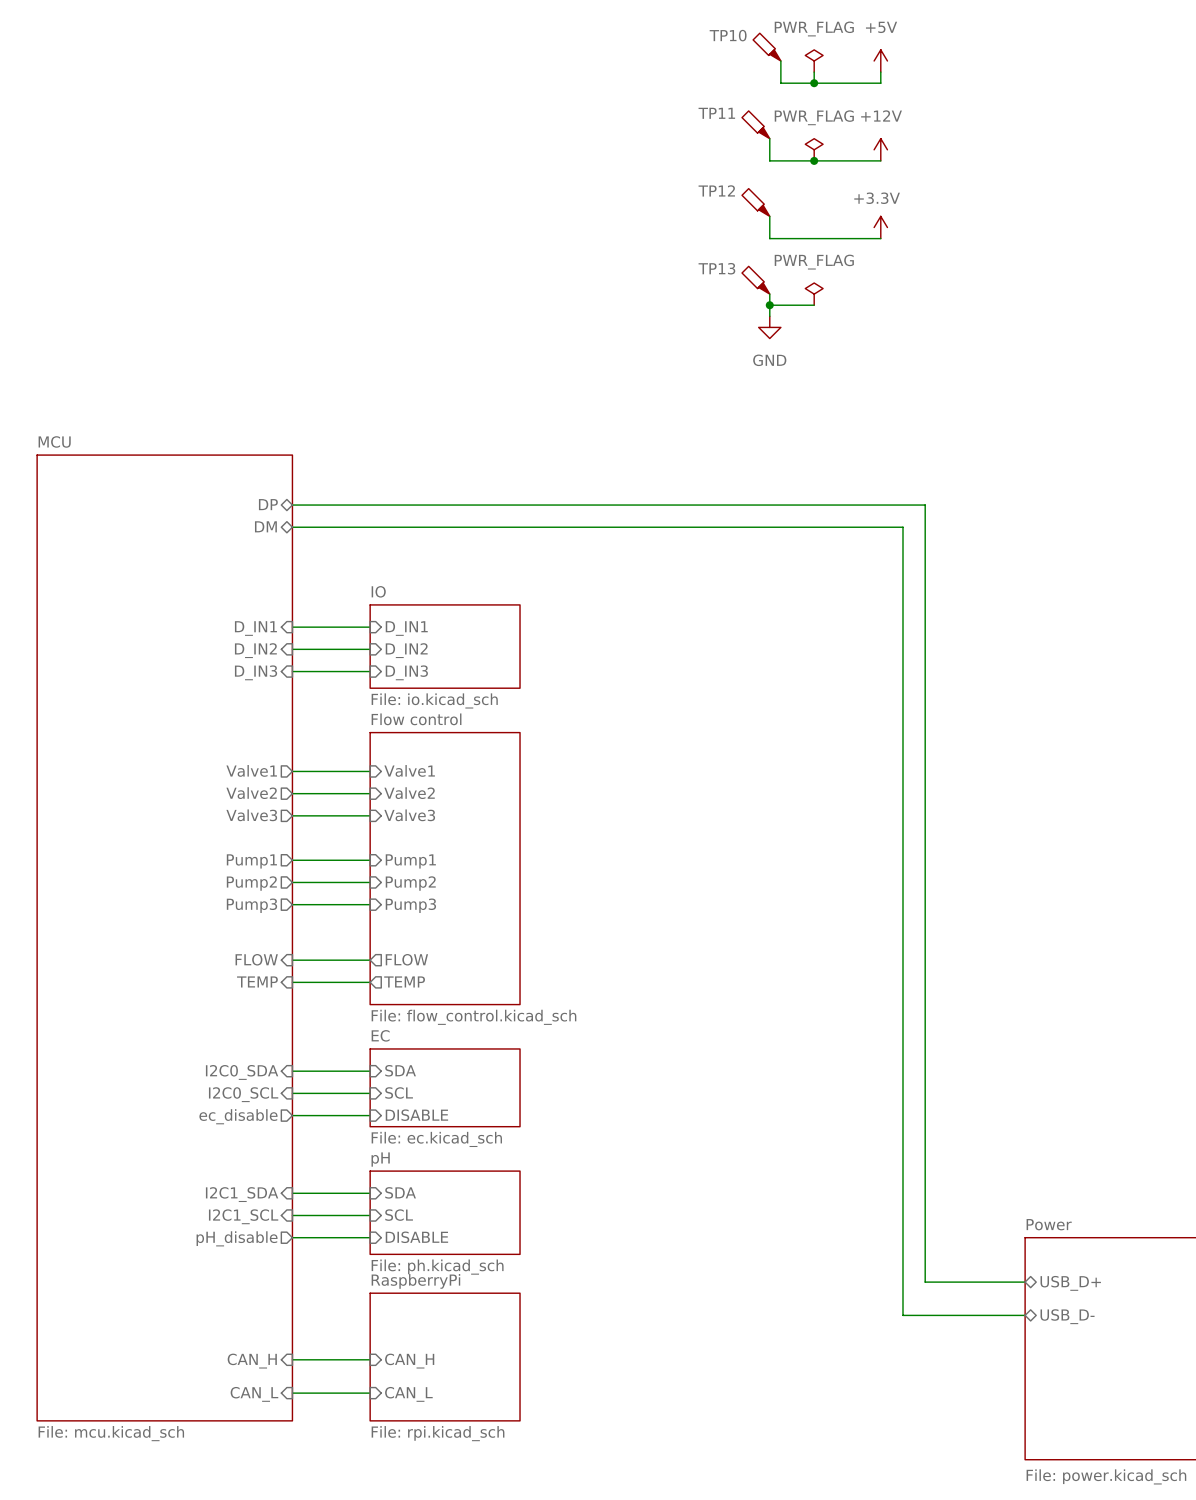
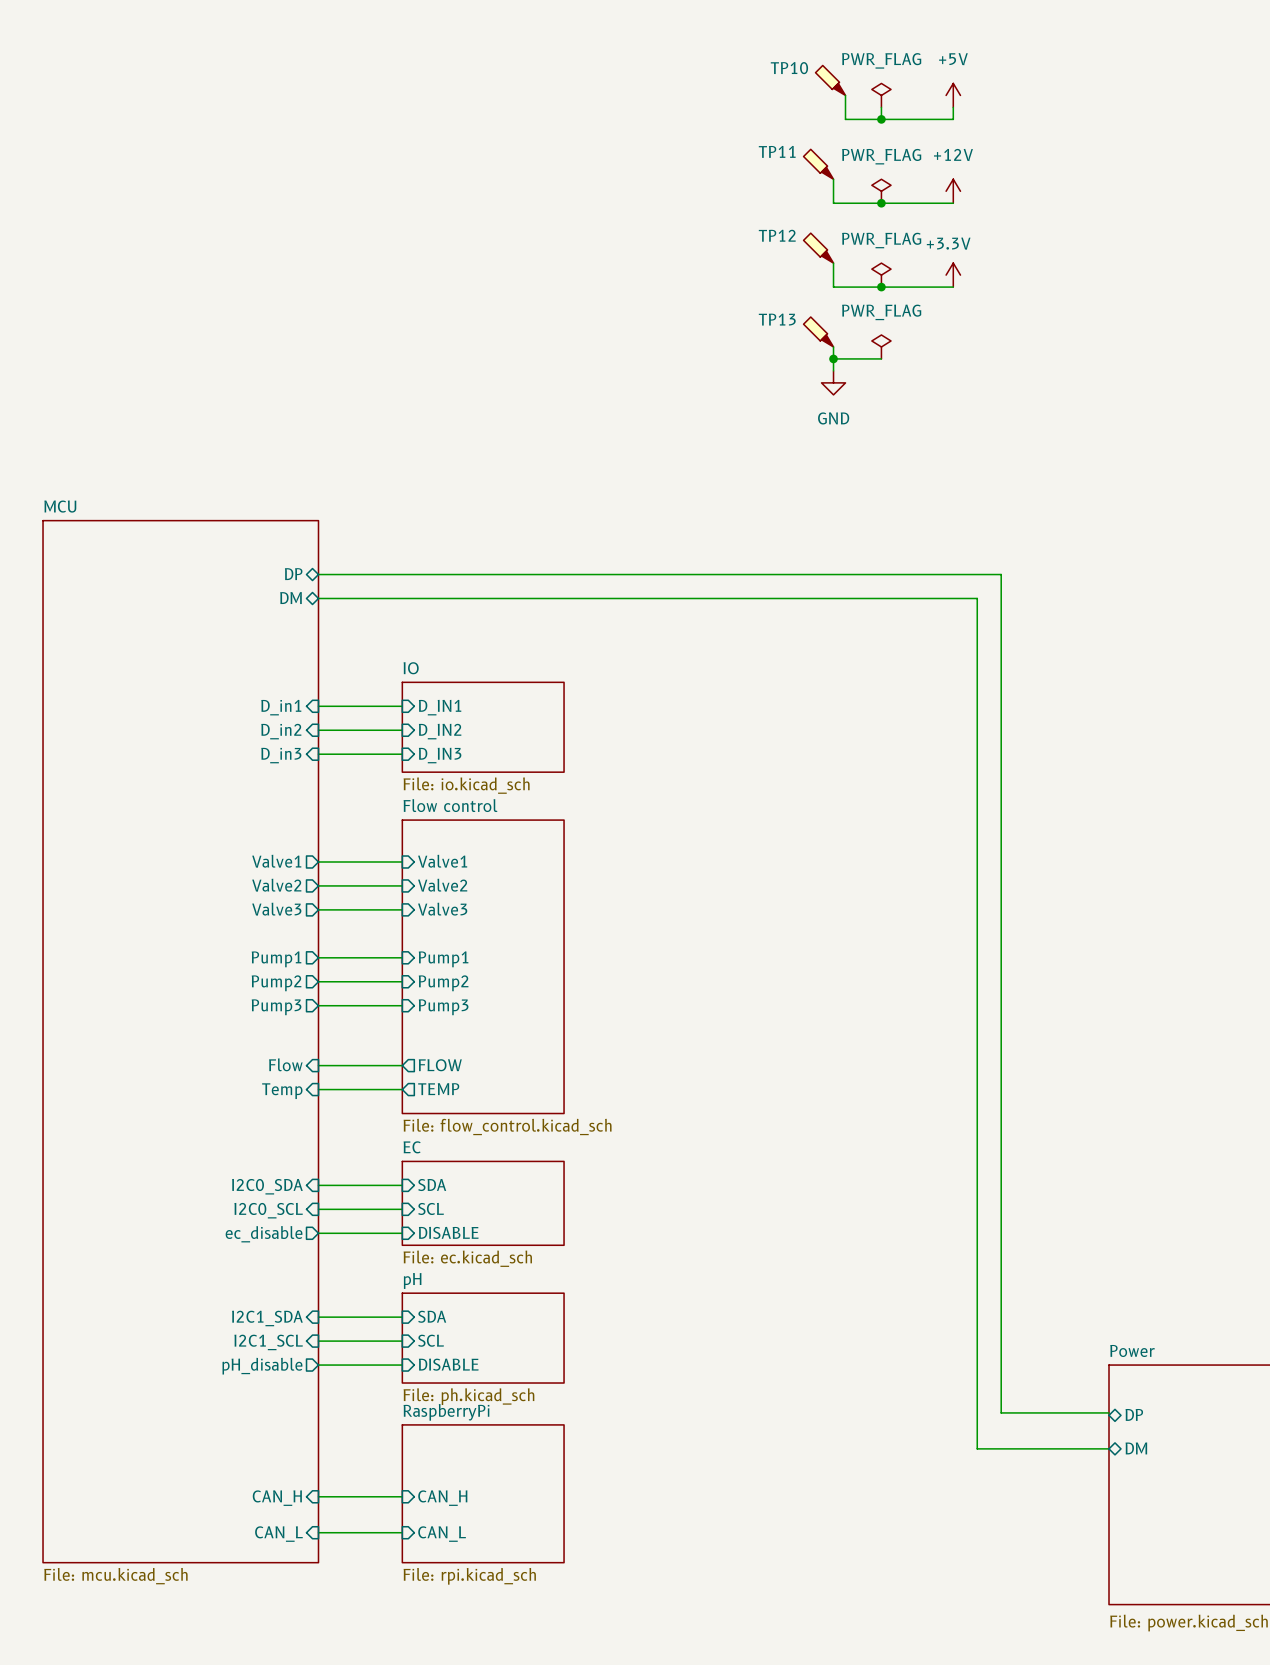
power symbol: none -> PWR_FLAG (881, 275)
junction: none -> (881, 287)
sheet pin: D_IN1 (255, 628) -> D_in1 (281, 707)
sheet pin: D_IN2 (255, 650) -> D_in2 (281, 731)
sheet pin: D_IN3 (256, 672) -> D_in3 (281, 755)
sheet pin: FLOW (256, 959) -> Flow (285, 1064)
sheet pin: TEMP (257, 981) -> Temp (282, 1091)
sheet pin: USB_D+ (1070, 1283) -> DP (1134, 1414)
sheet pin: USB_D- (1067, 1316) -> DM (1136, 1448)

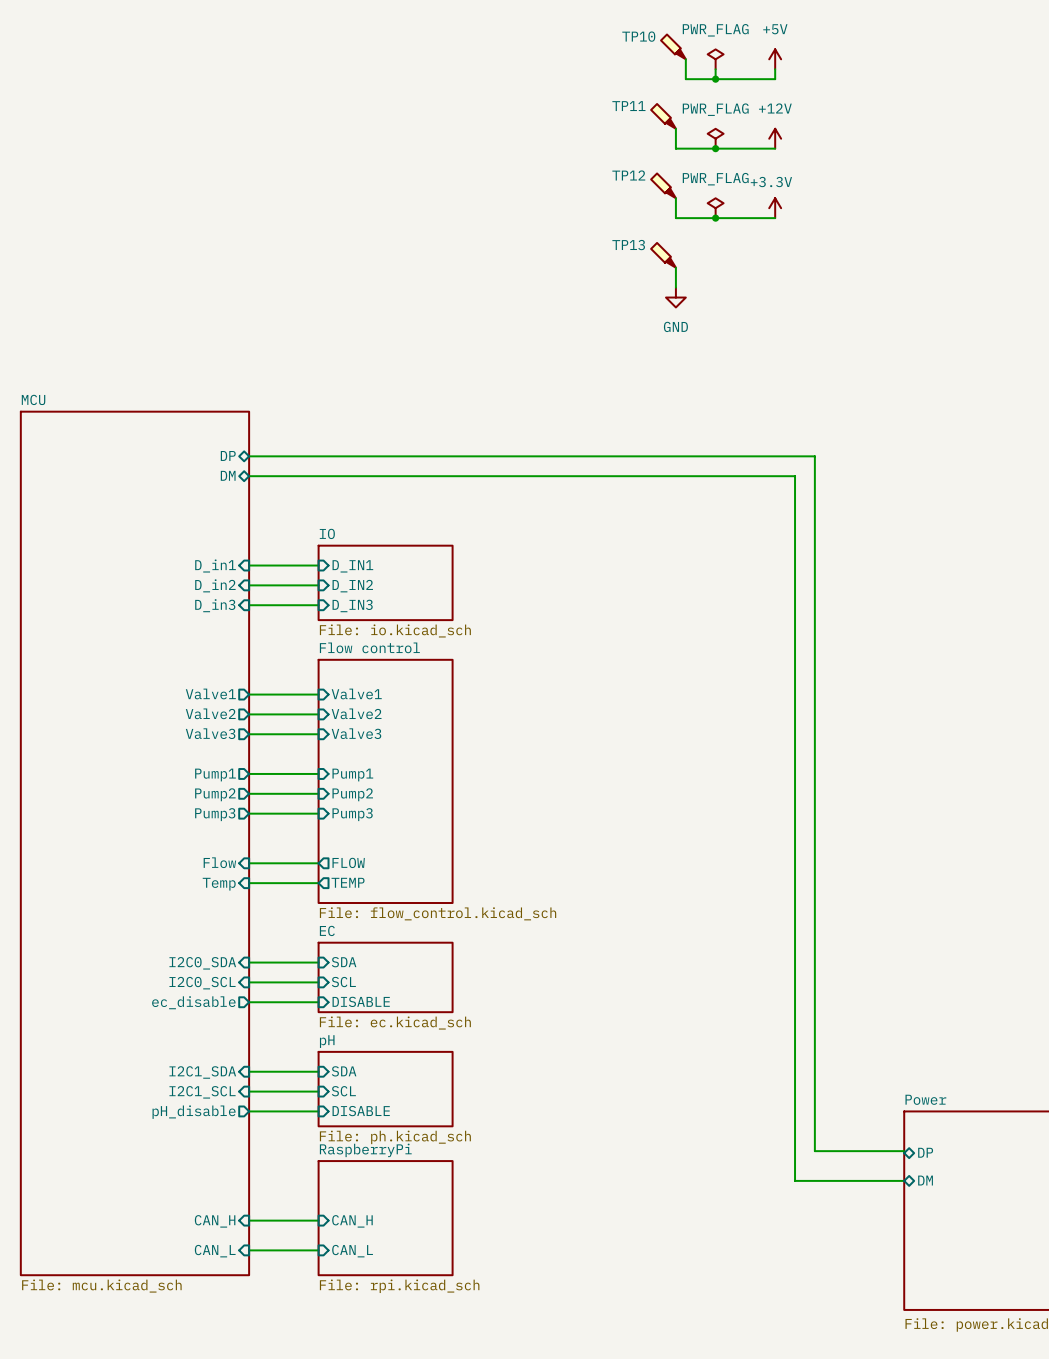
power symbol: PWR_FLAG (881, 346) -> none
wire: (833, 358) (881, 358) -> none
junction: (833, 358) -> none

